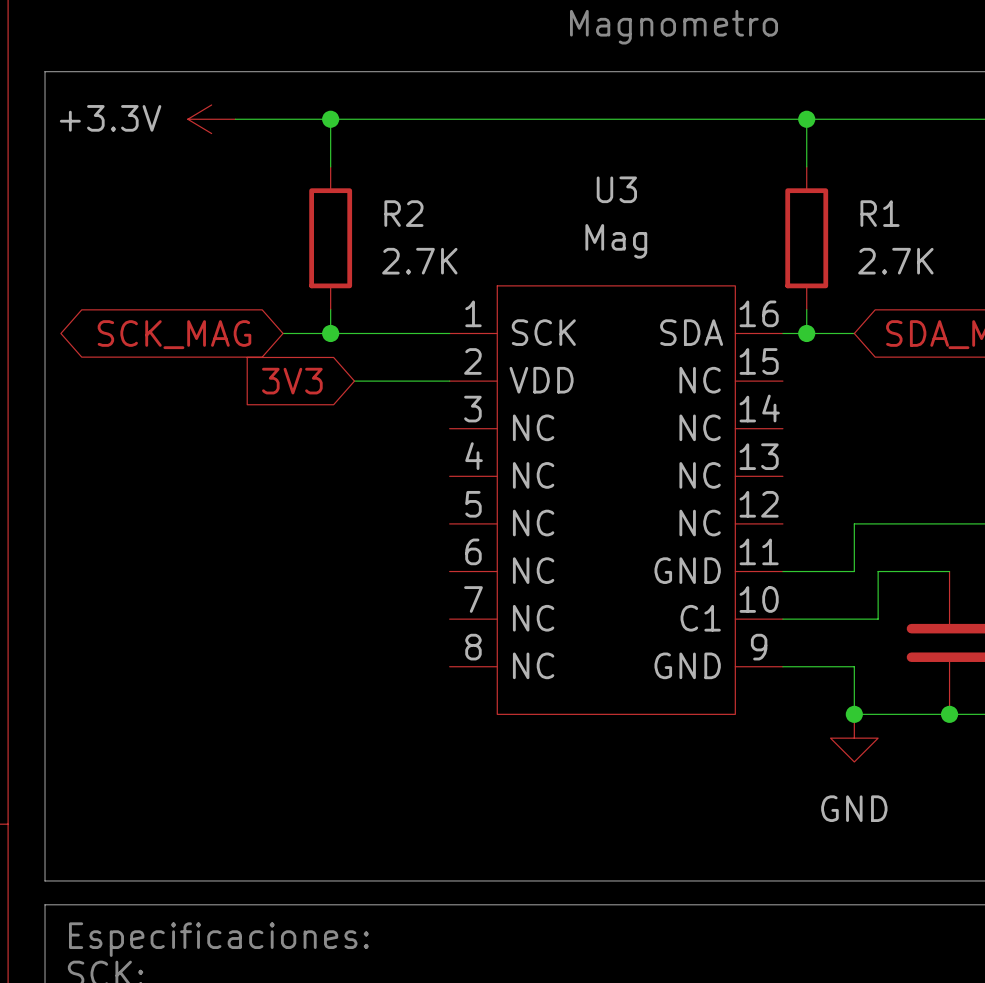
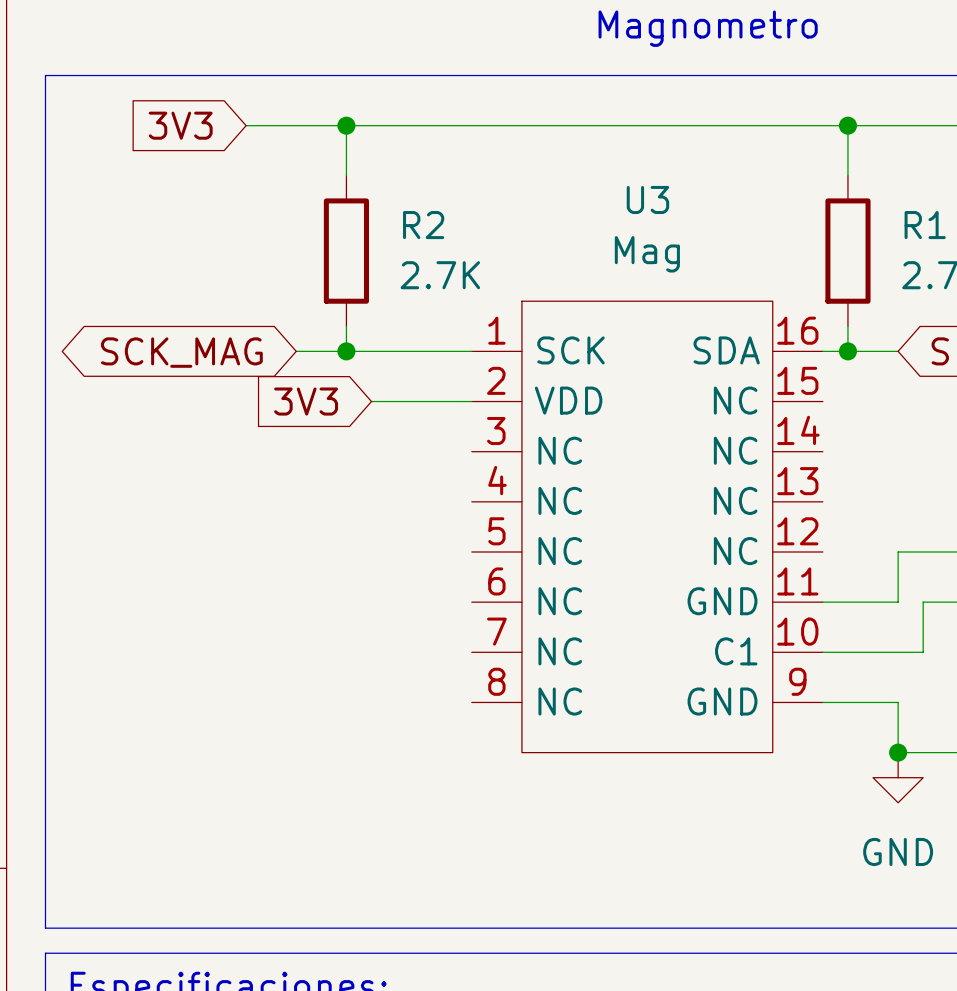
global label: none -> 3V3 (180, 125)
power symbol: +3.3V (211, 119) -> none

